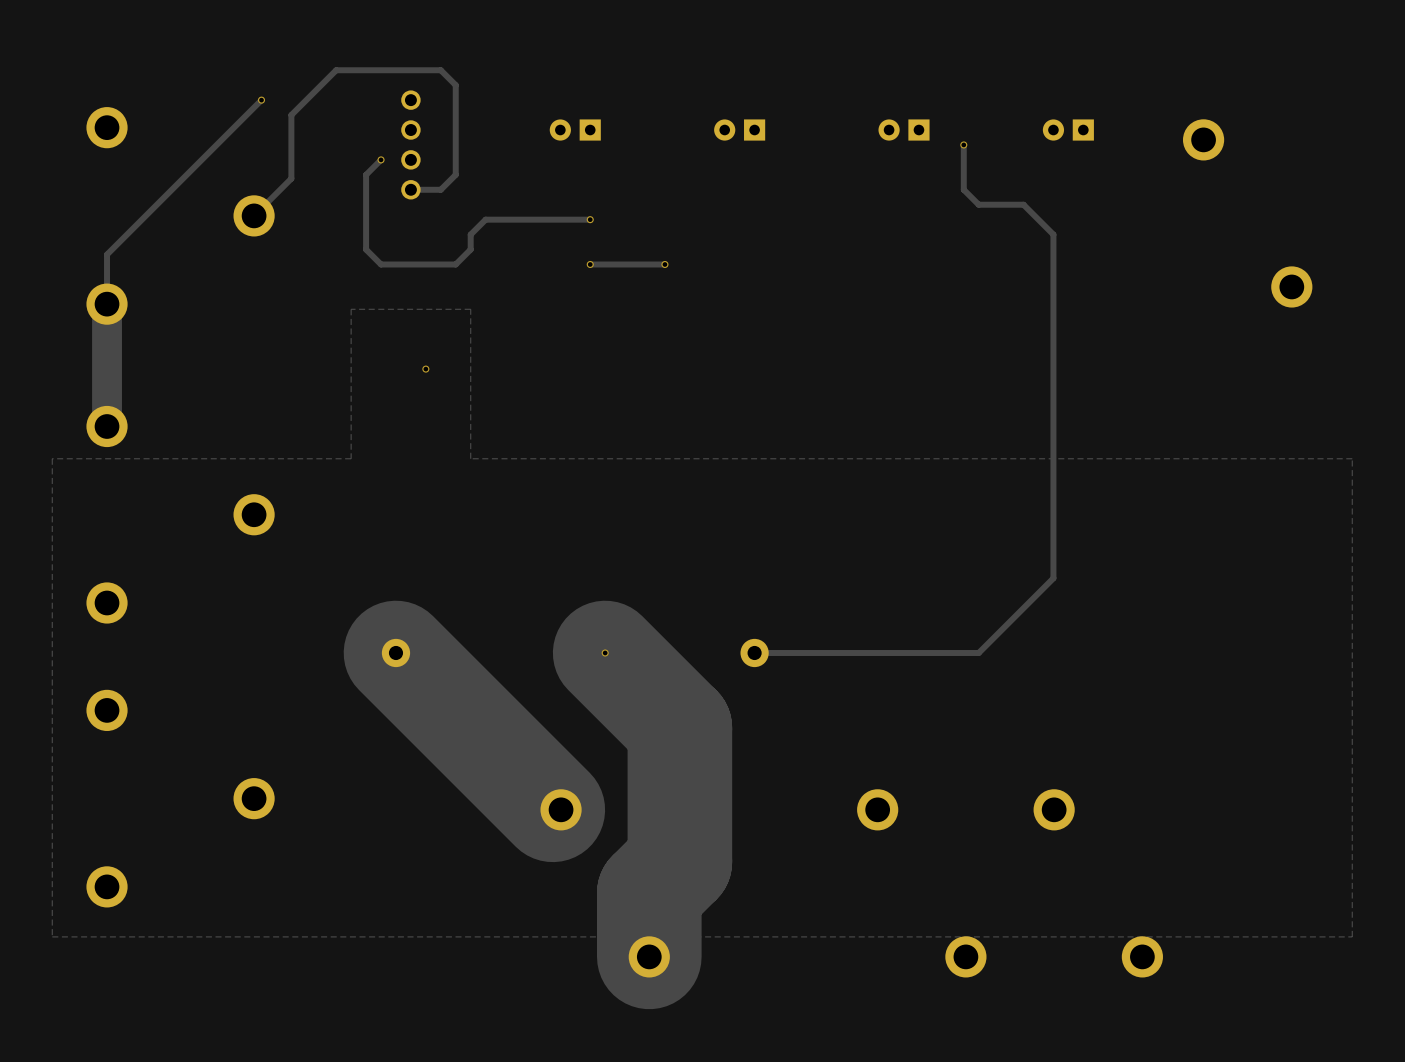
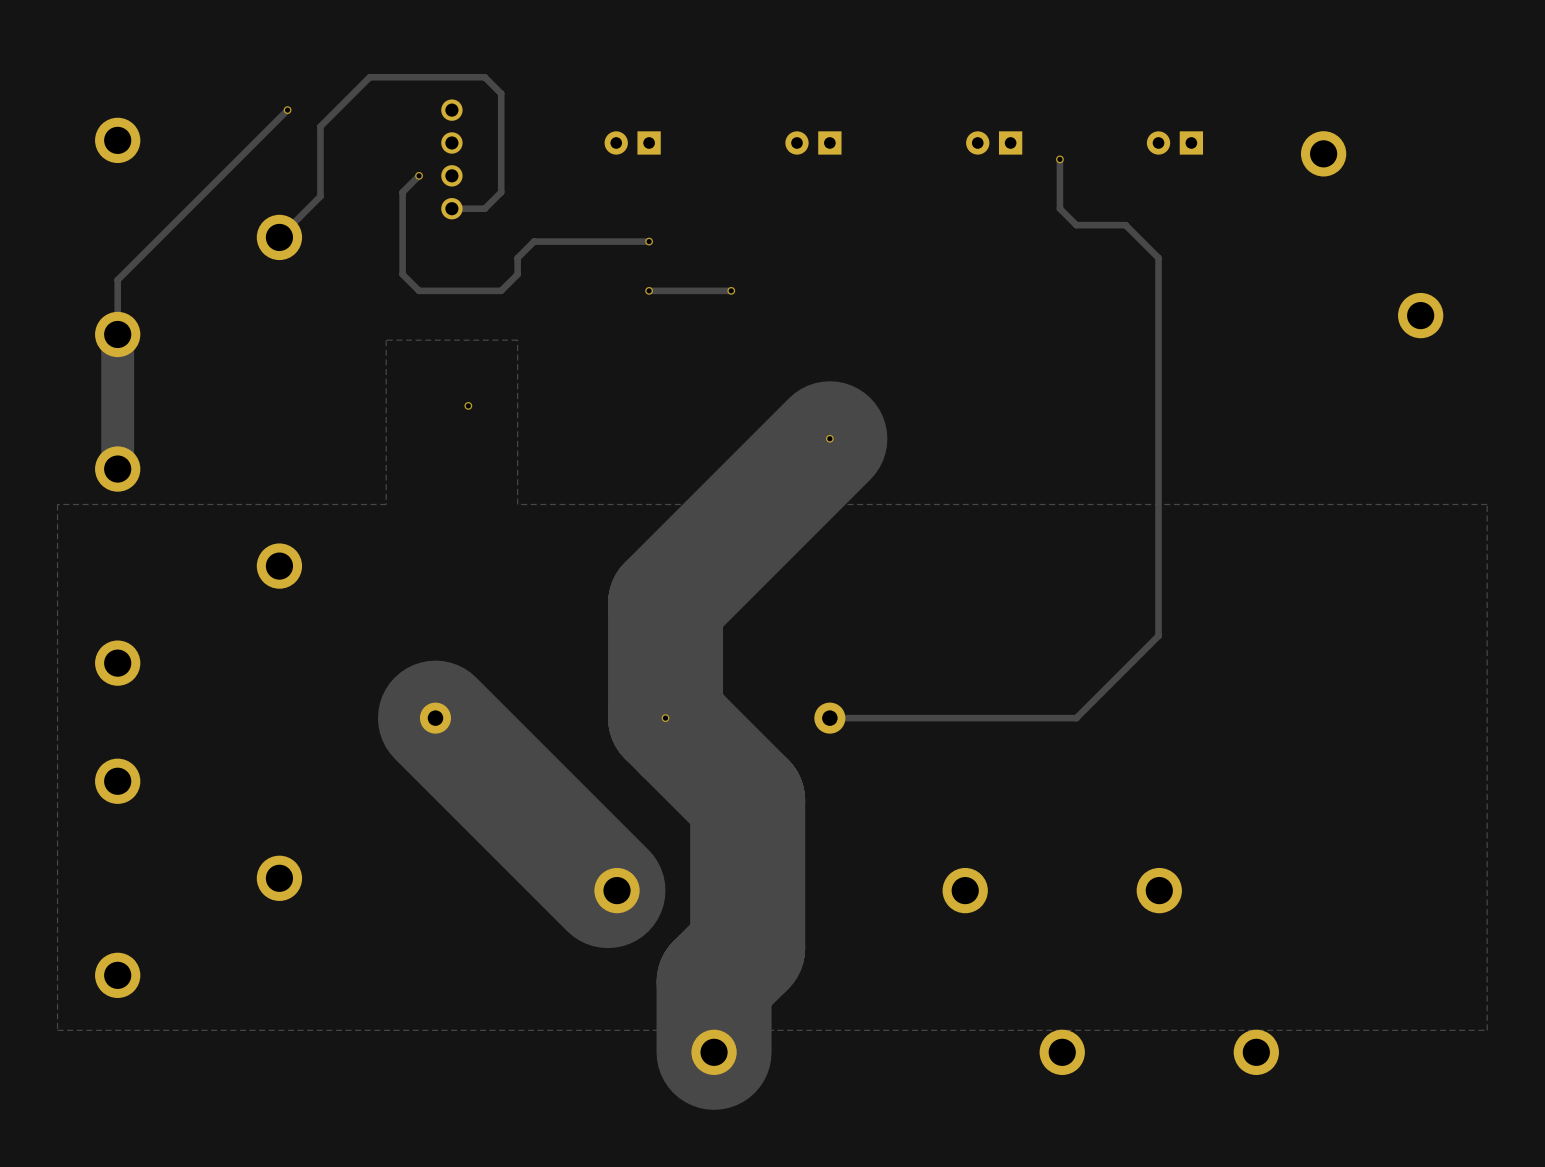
track: none -> (829, 438) (665, 603) (665, 718)
via: none -> (829, 438)

